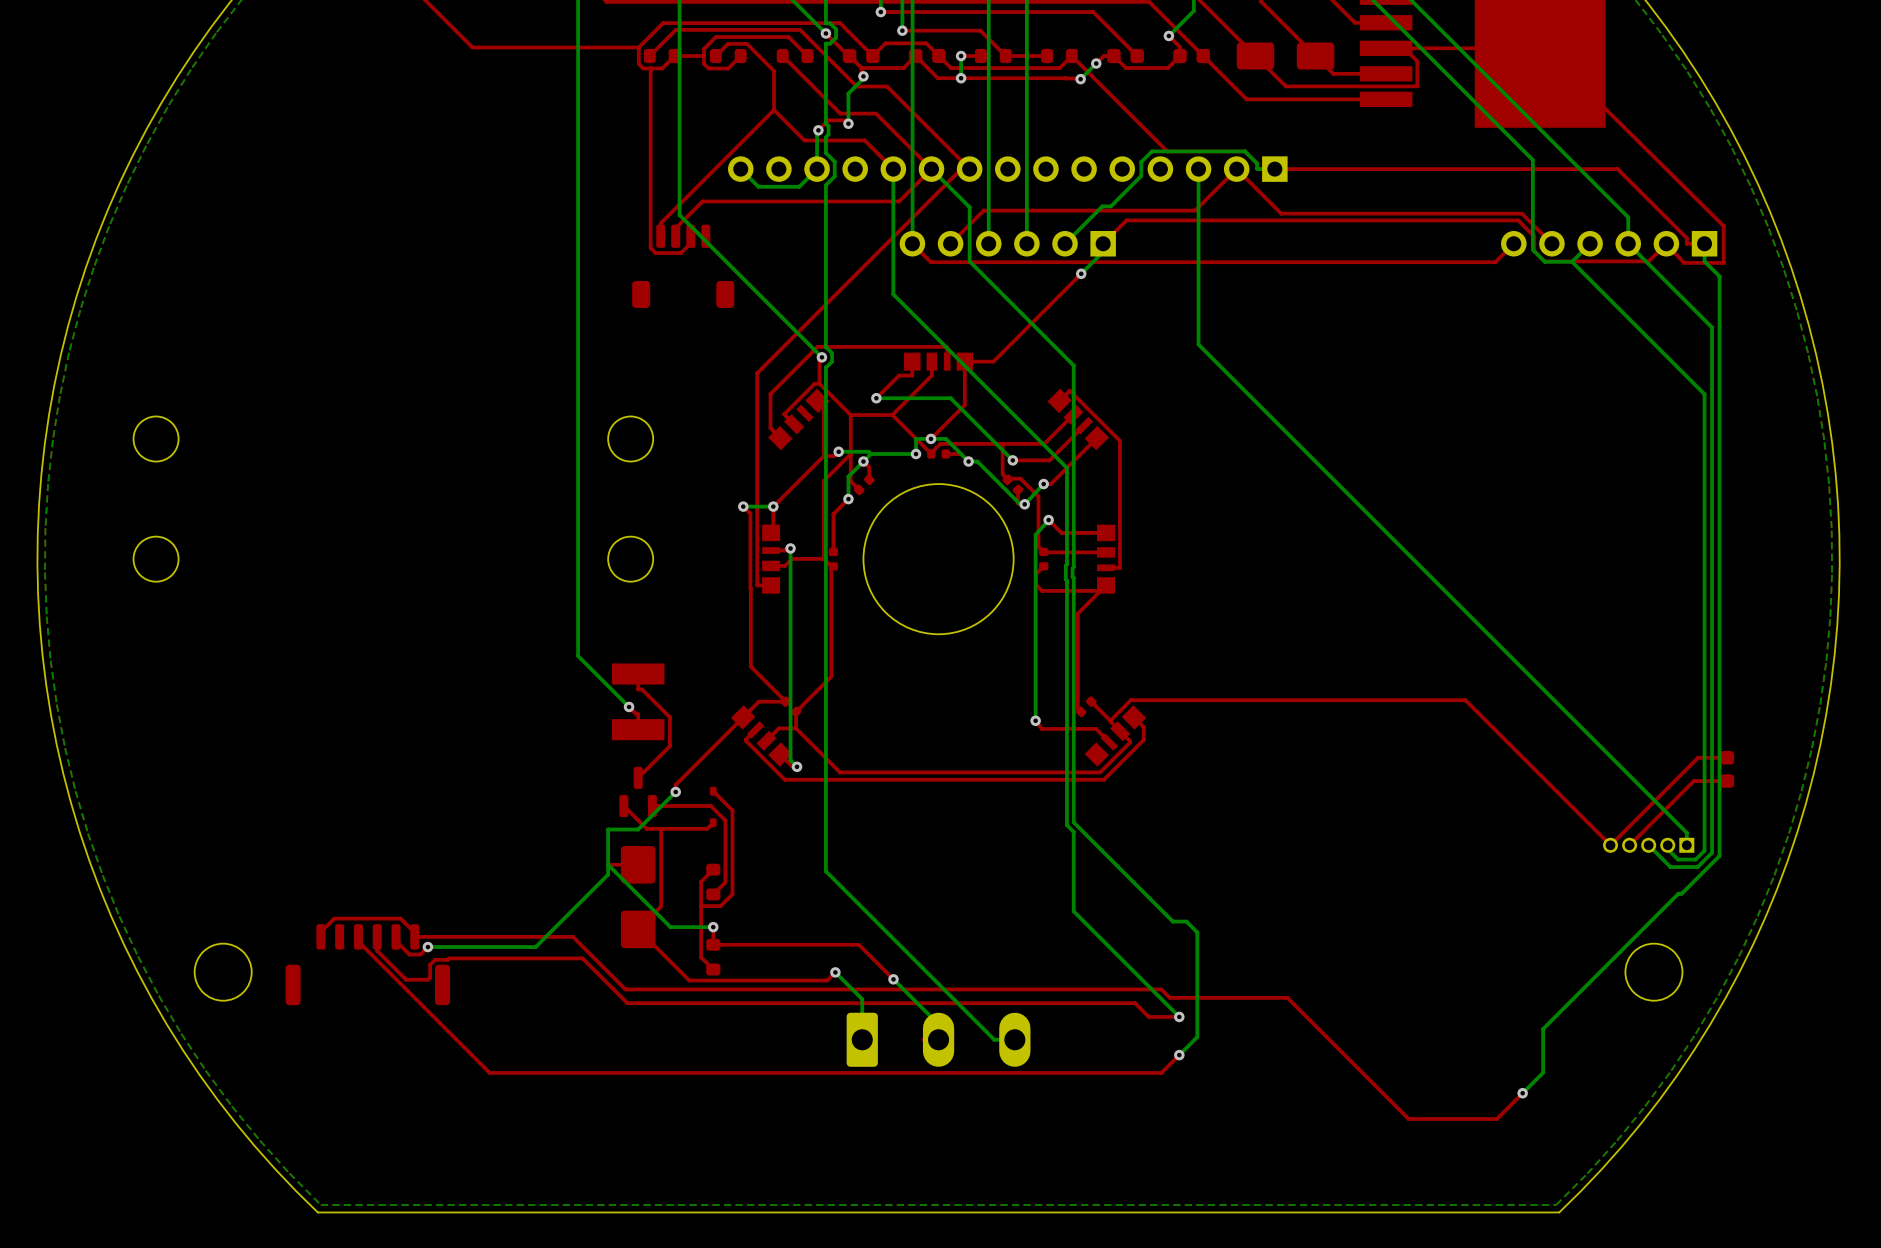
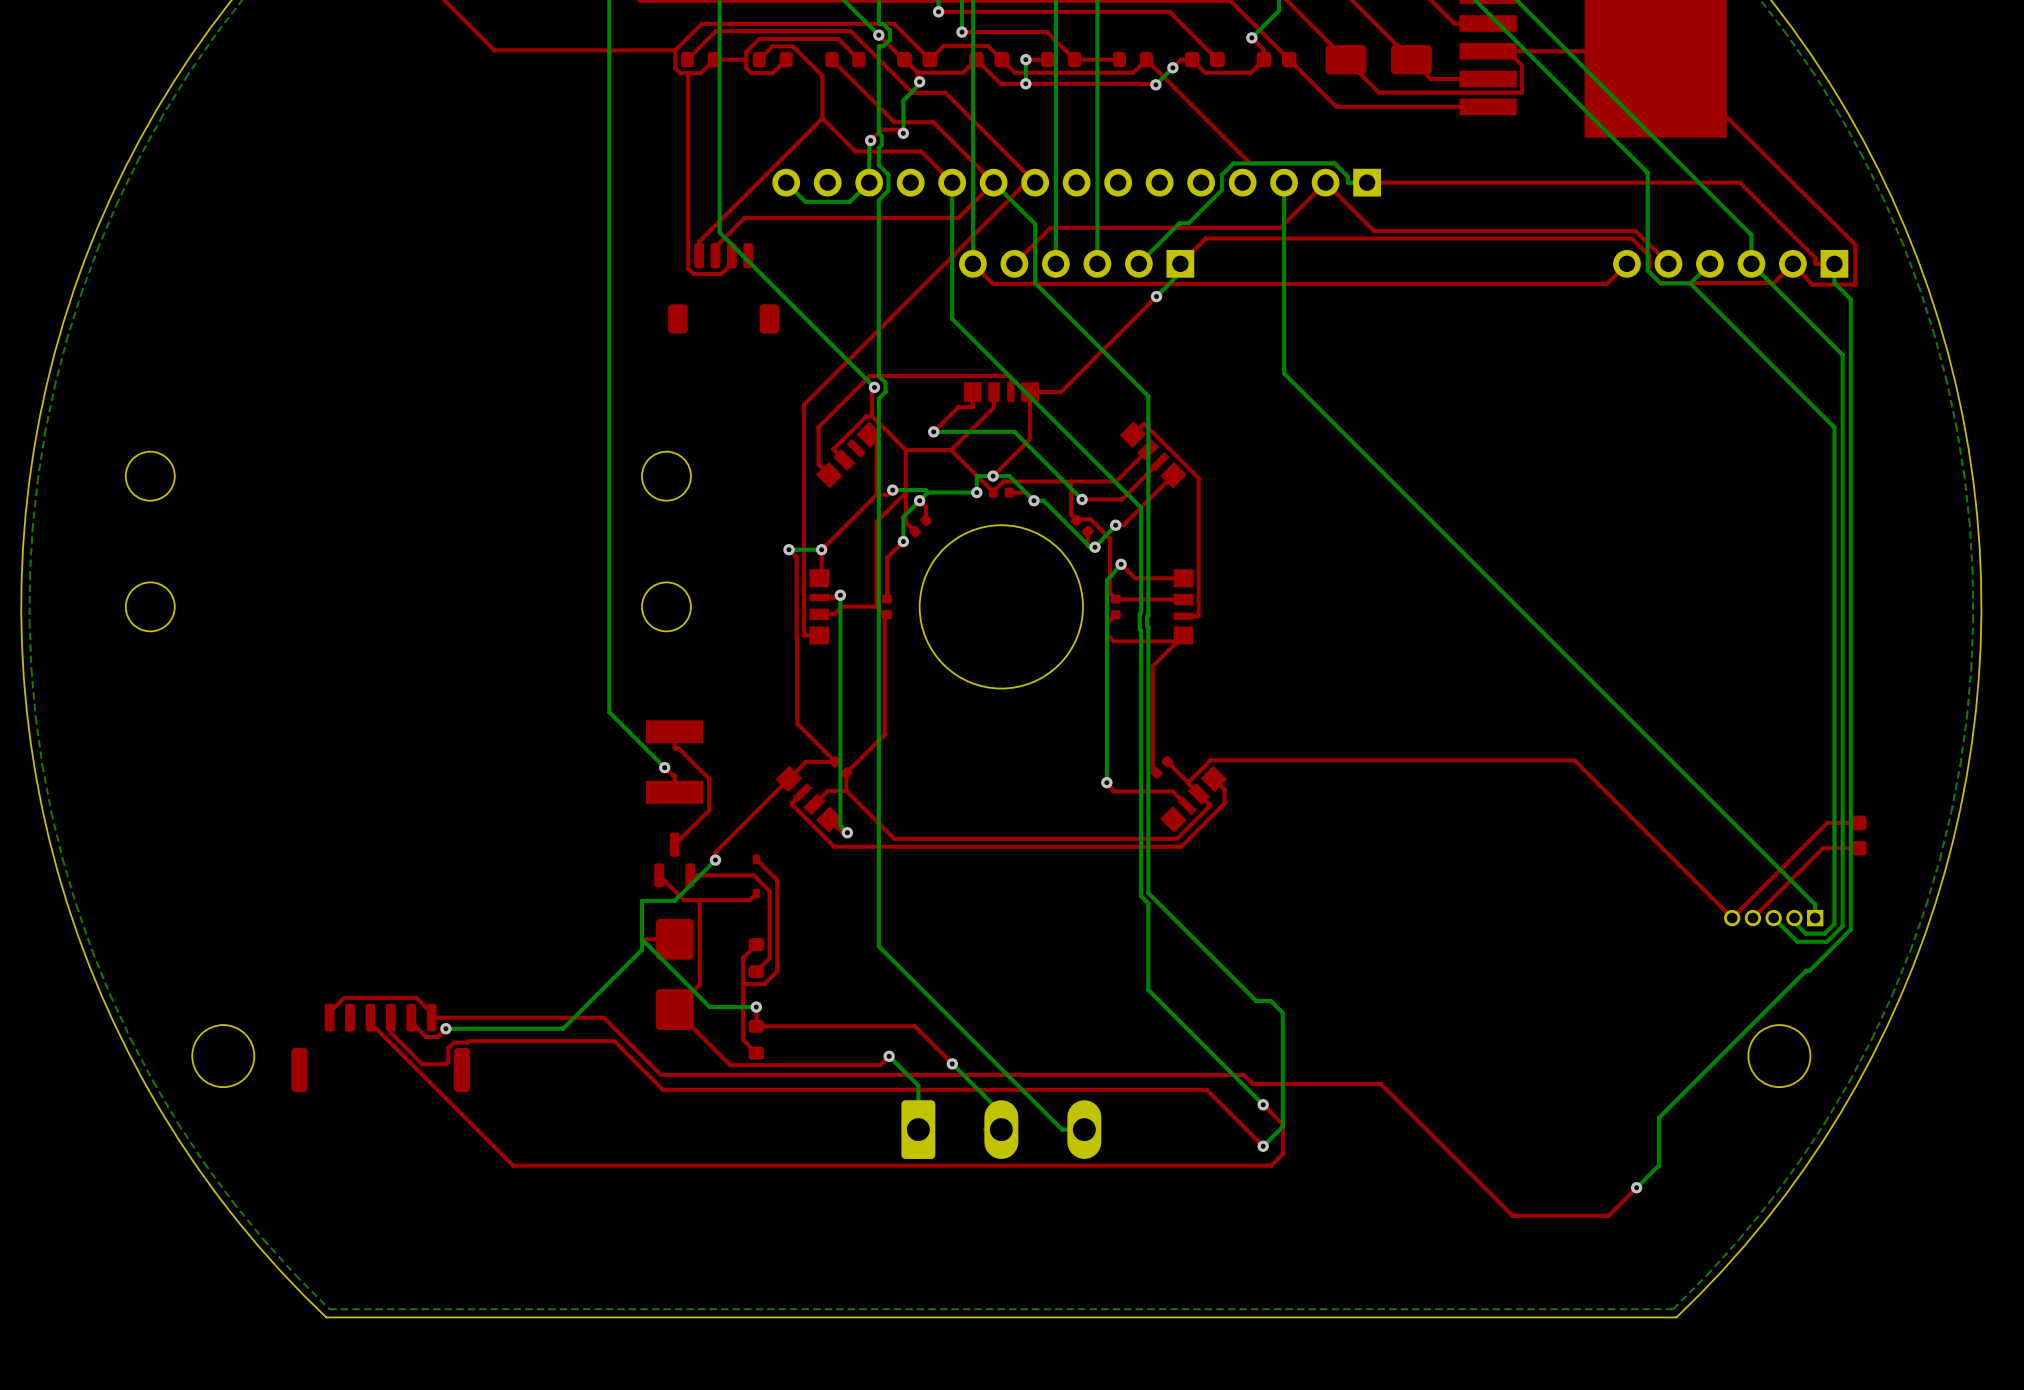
top track: (1127, 1003) (1135, 1003) (1148, 1016) (1179, 1016) -> (1206, 1089) (1263, 1146)
top track: (1179, 1055) (1161, 1072) -> (1263, 1104) (1282, 1124) (1282, 1154) (1271, 1165) (1243, 1165)

